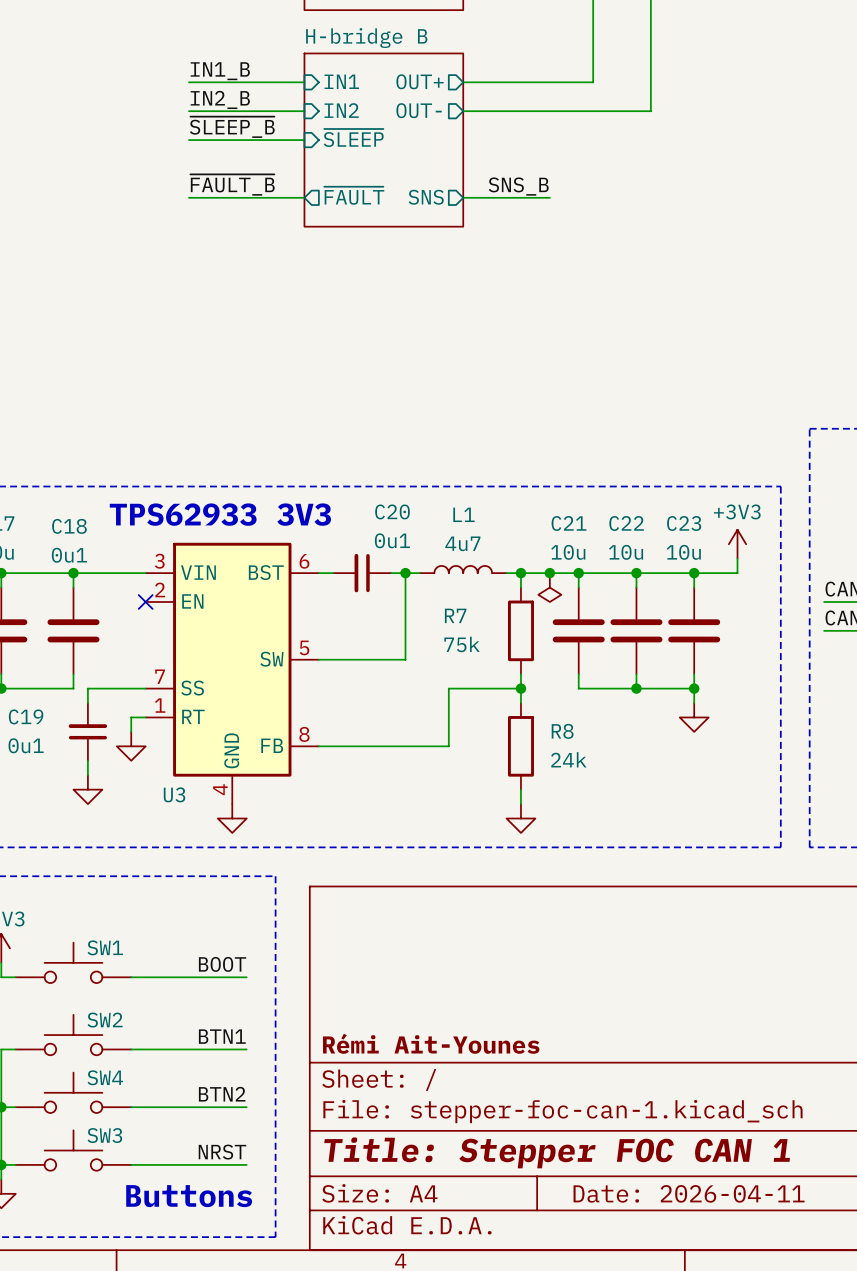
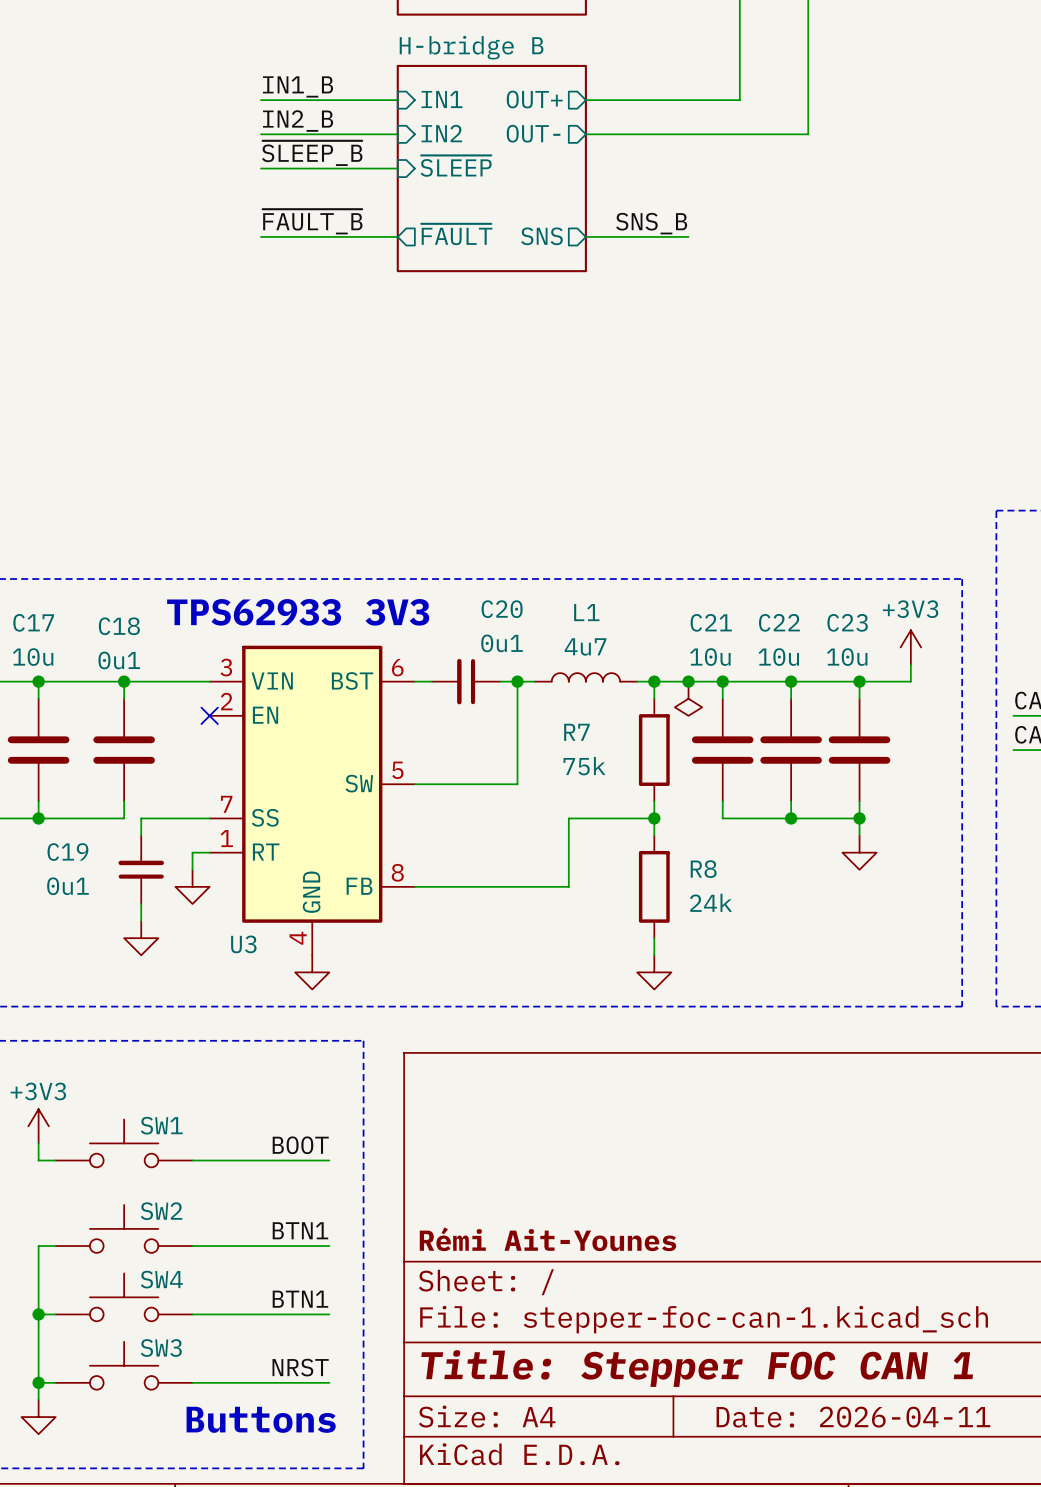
label: BTN2 (222, 1094) -> BTN1 (300, 1299)

